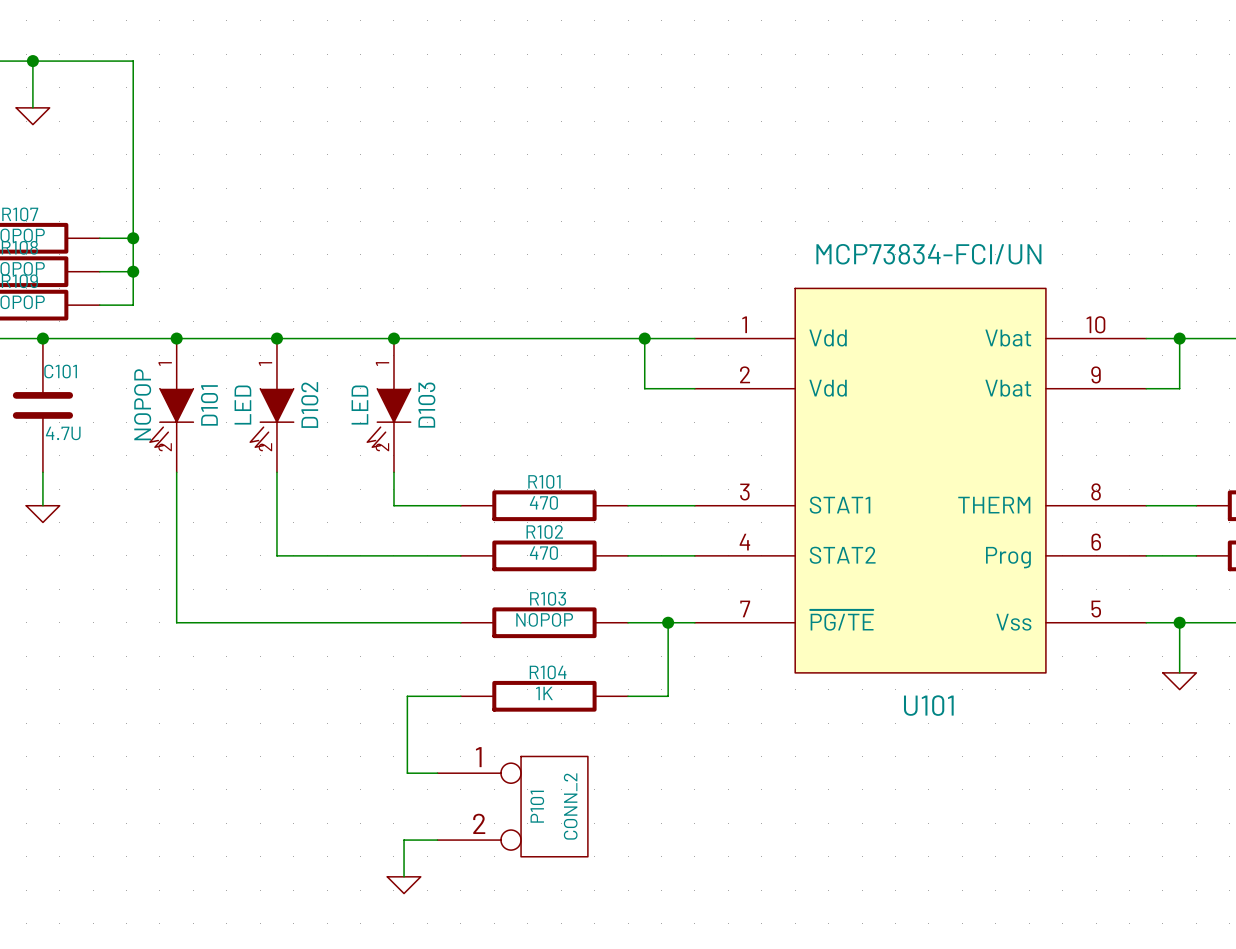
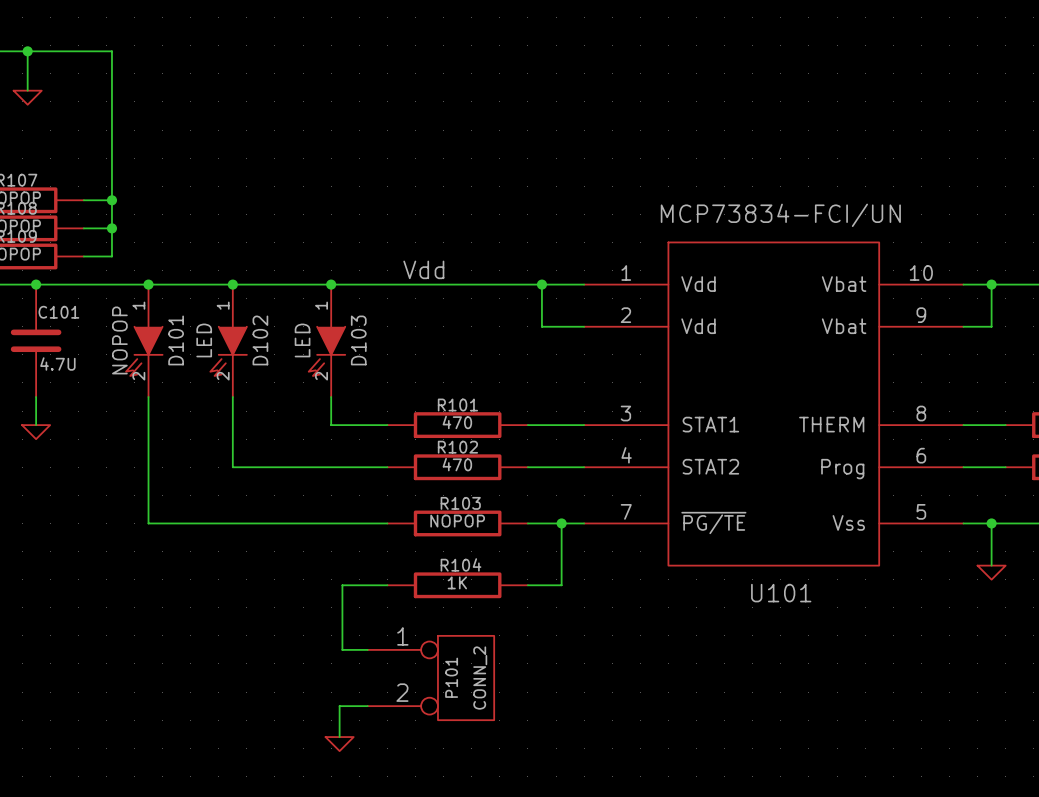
label: none -> Vdd (423, 269)

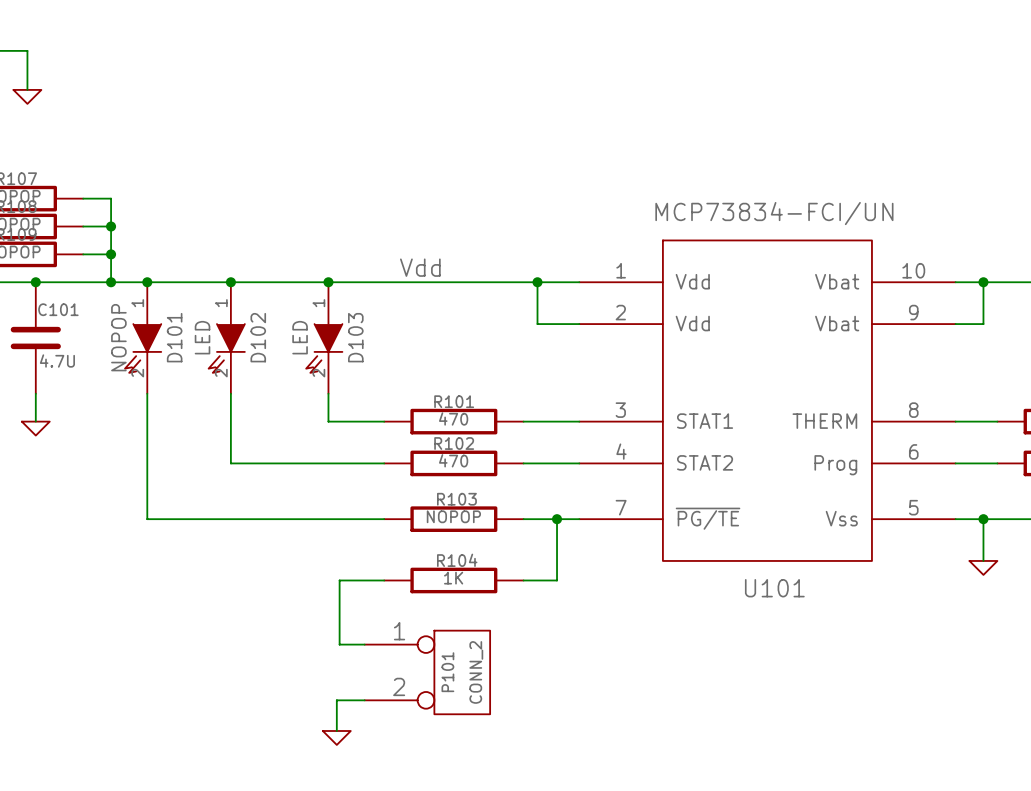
wire: (27, 51) (111, 51) (111, 200) -> none
junction: (27, 51) -> none
junction: (111, 200) -> none
wire: none -> (111, 254) (111, 282)
junction: none -> (111, 254)
junction: none -> (111, 282)

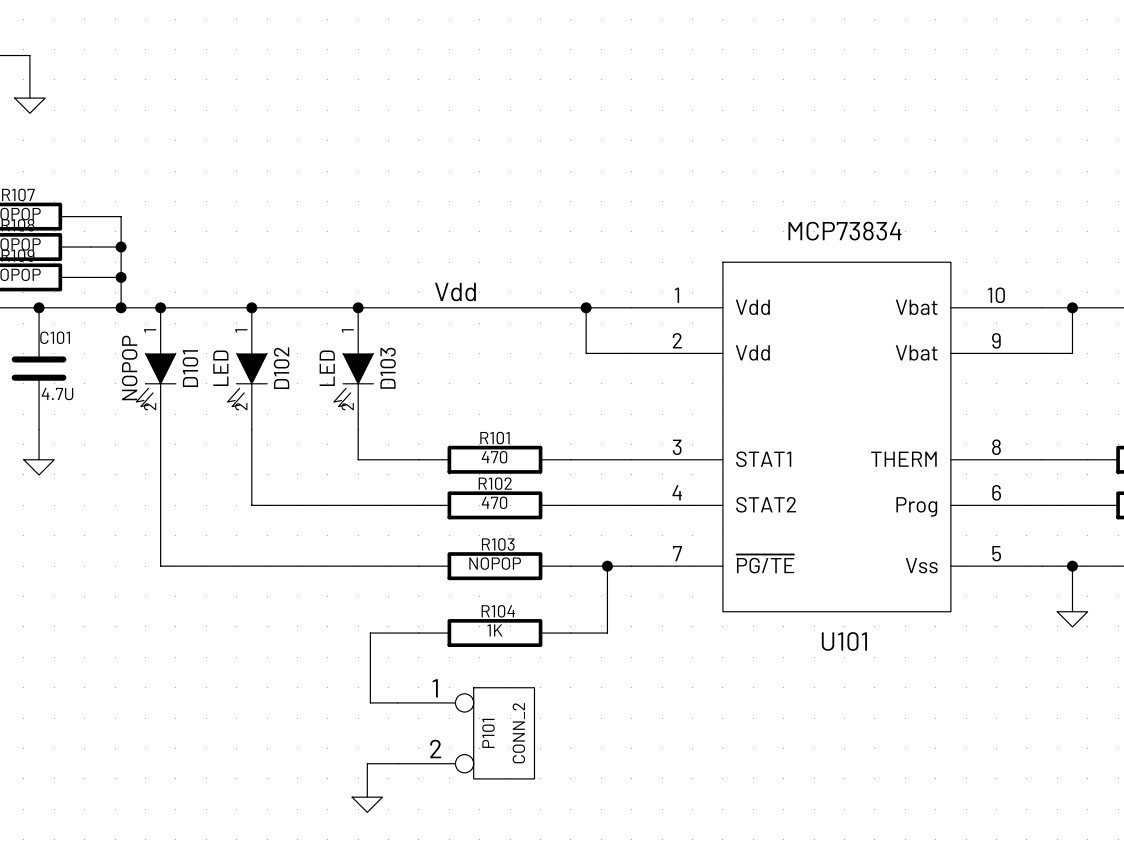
U101 value: MCP73834-FCI/UN (774, 213) -> MCP73834 (844, 231)

